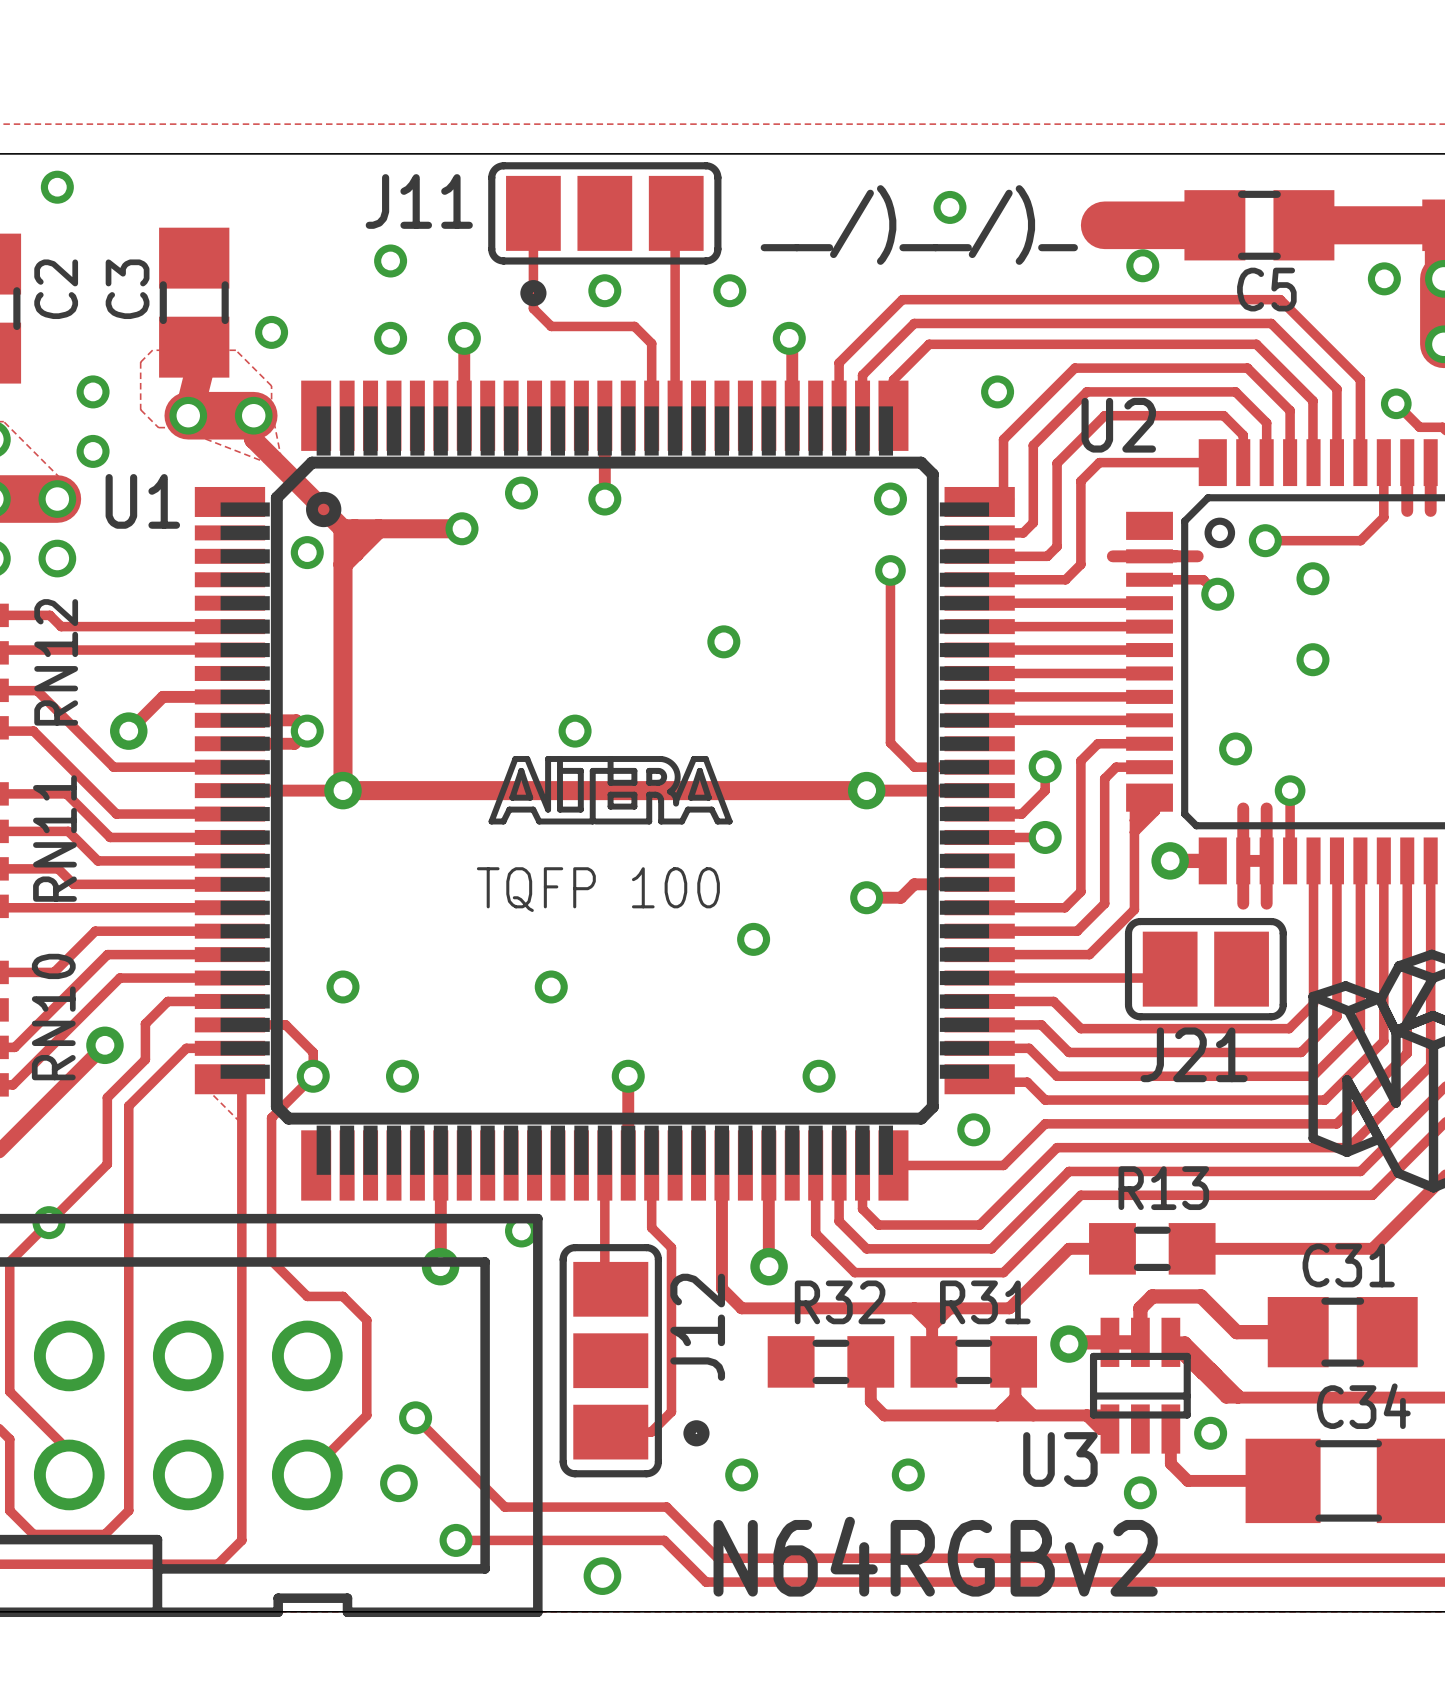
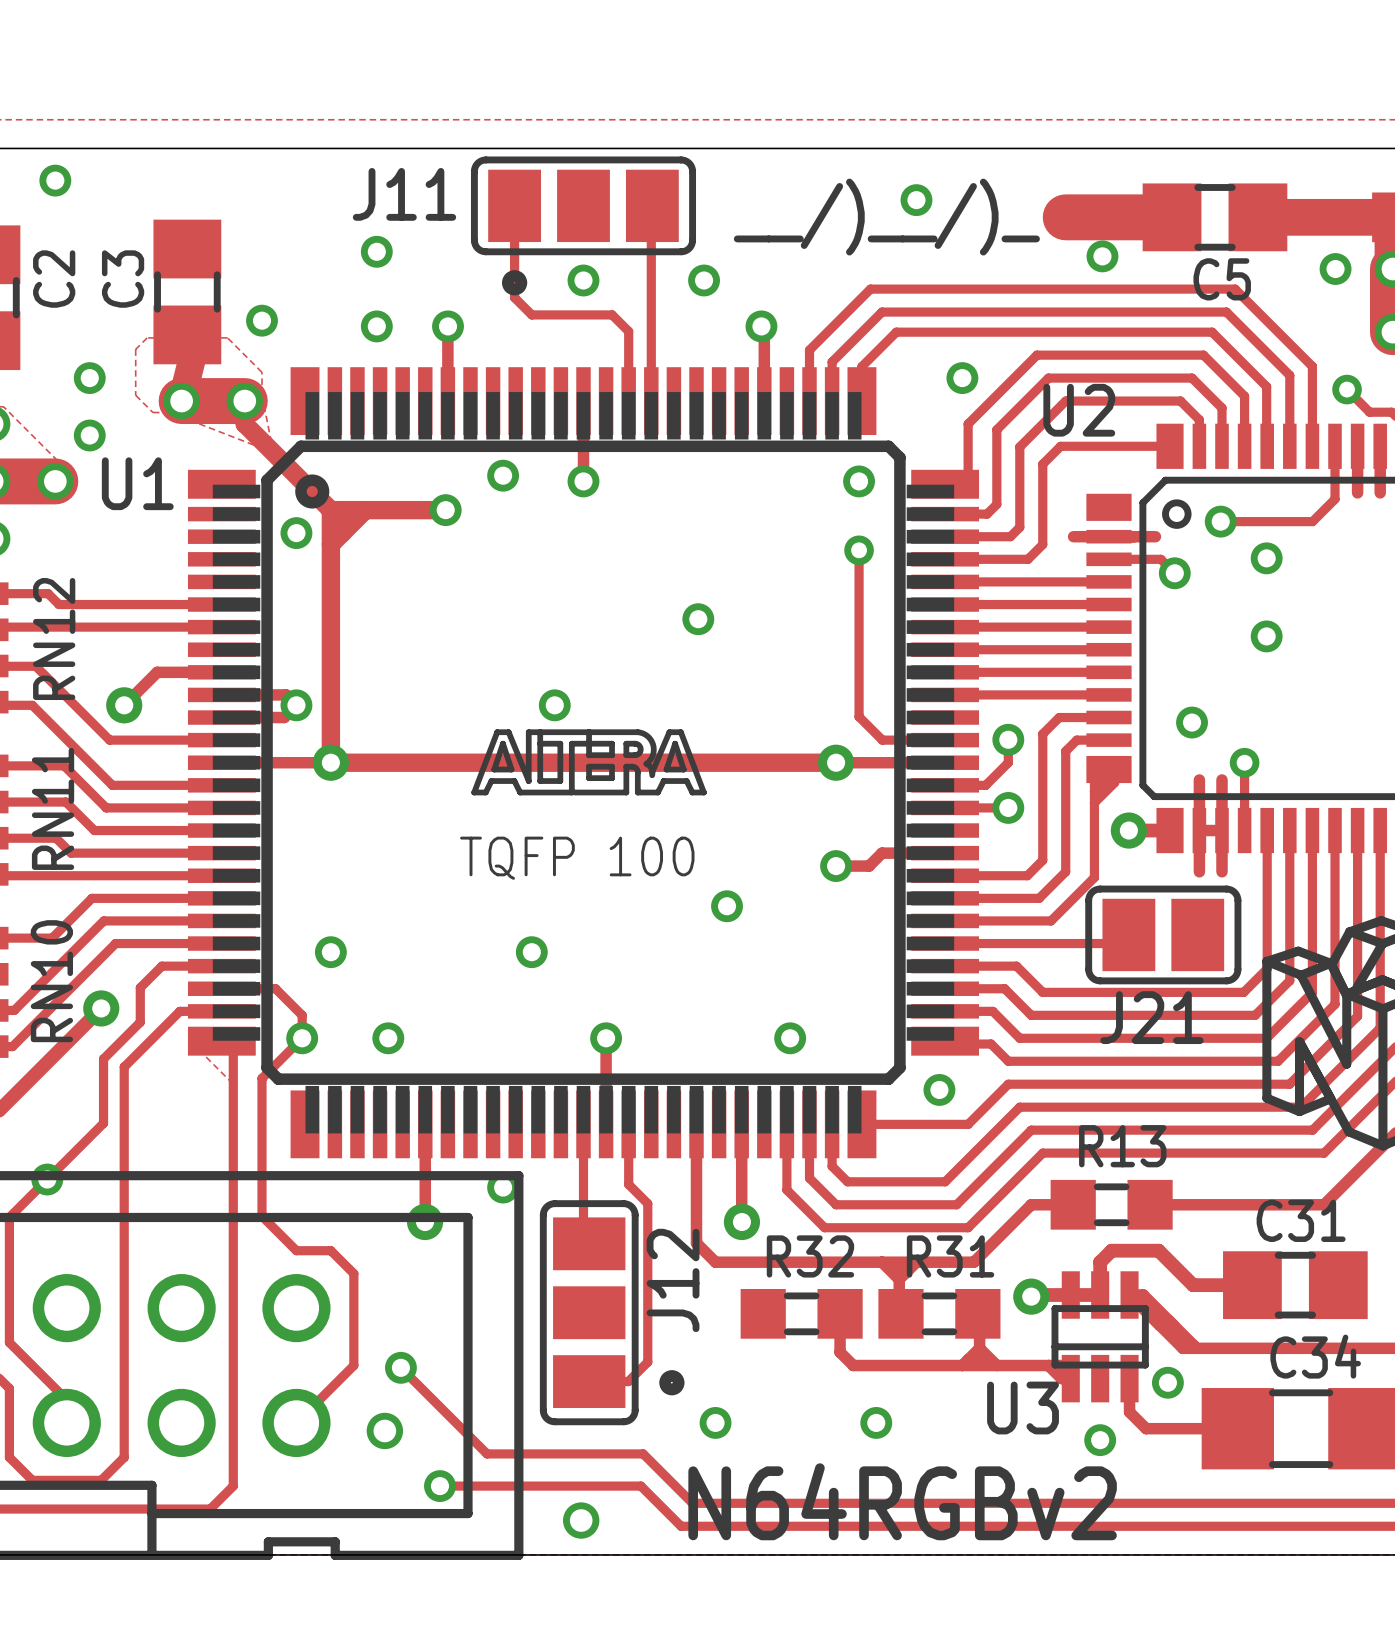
via: (57, 558) -> none

